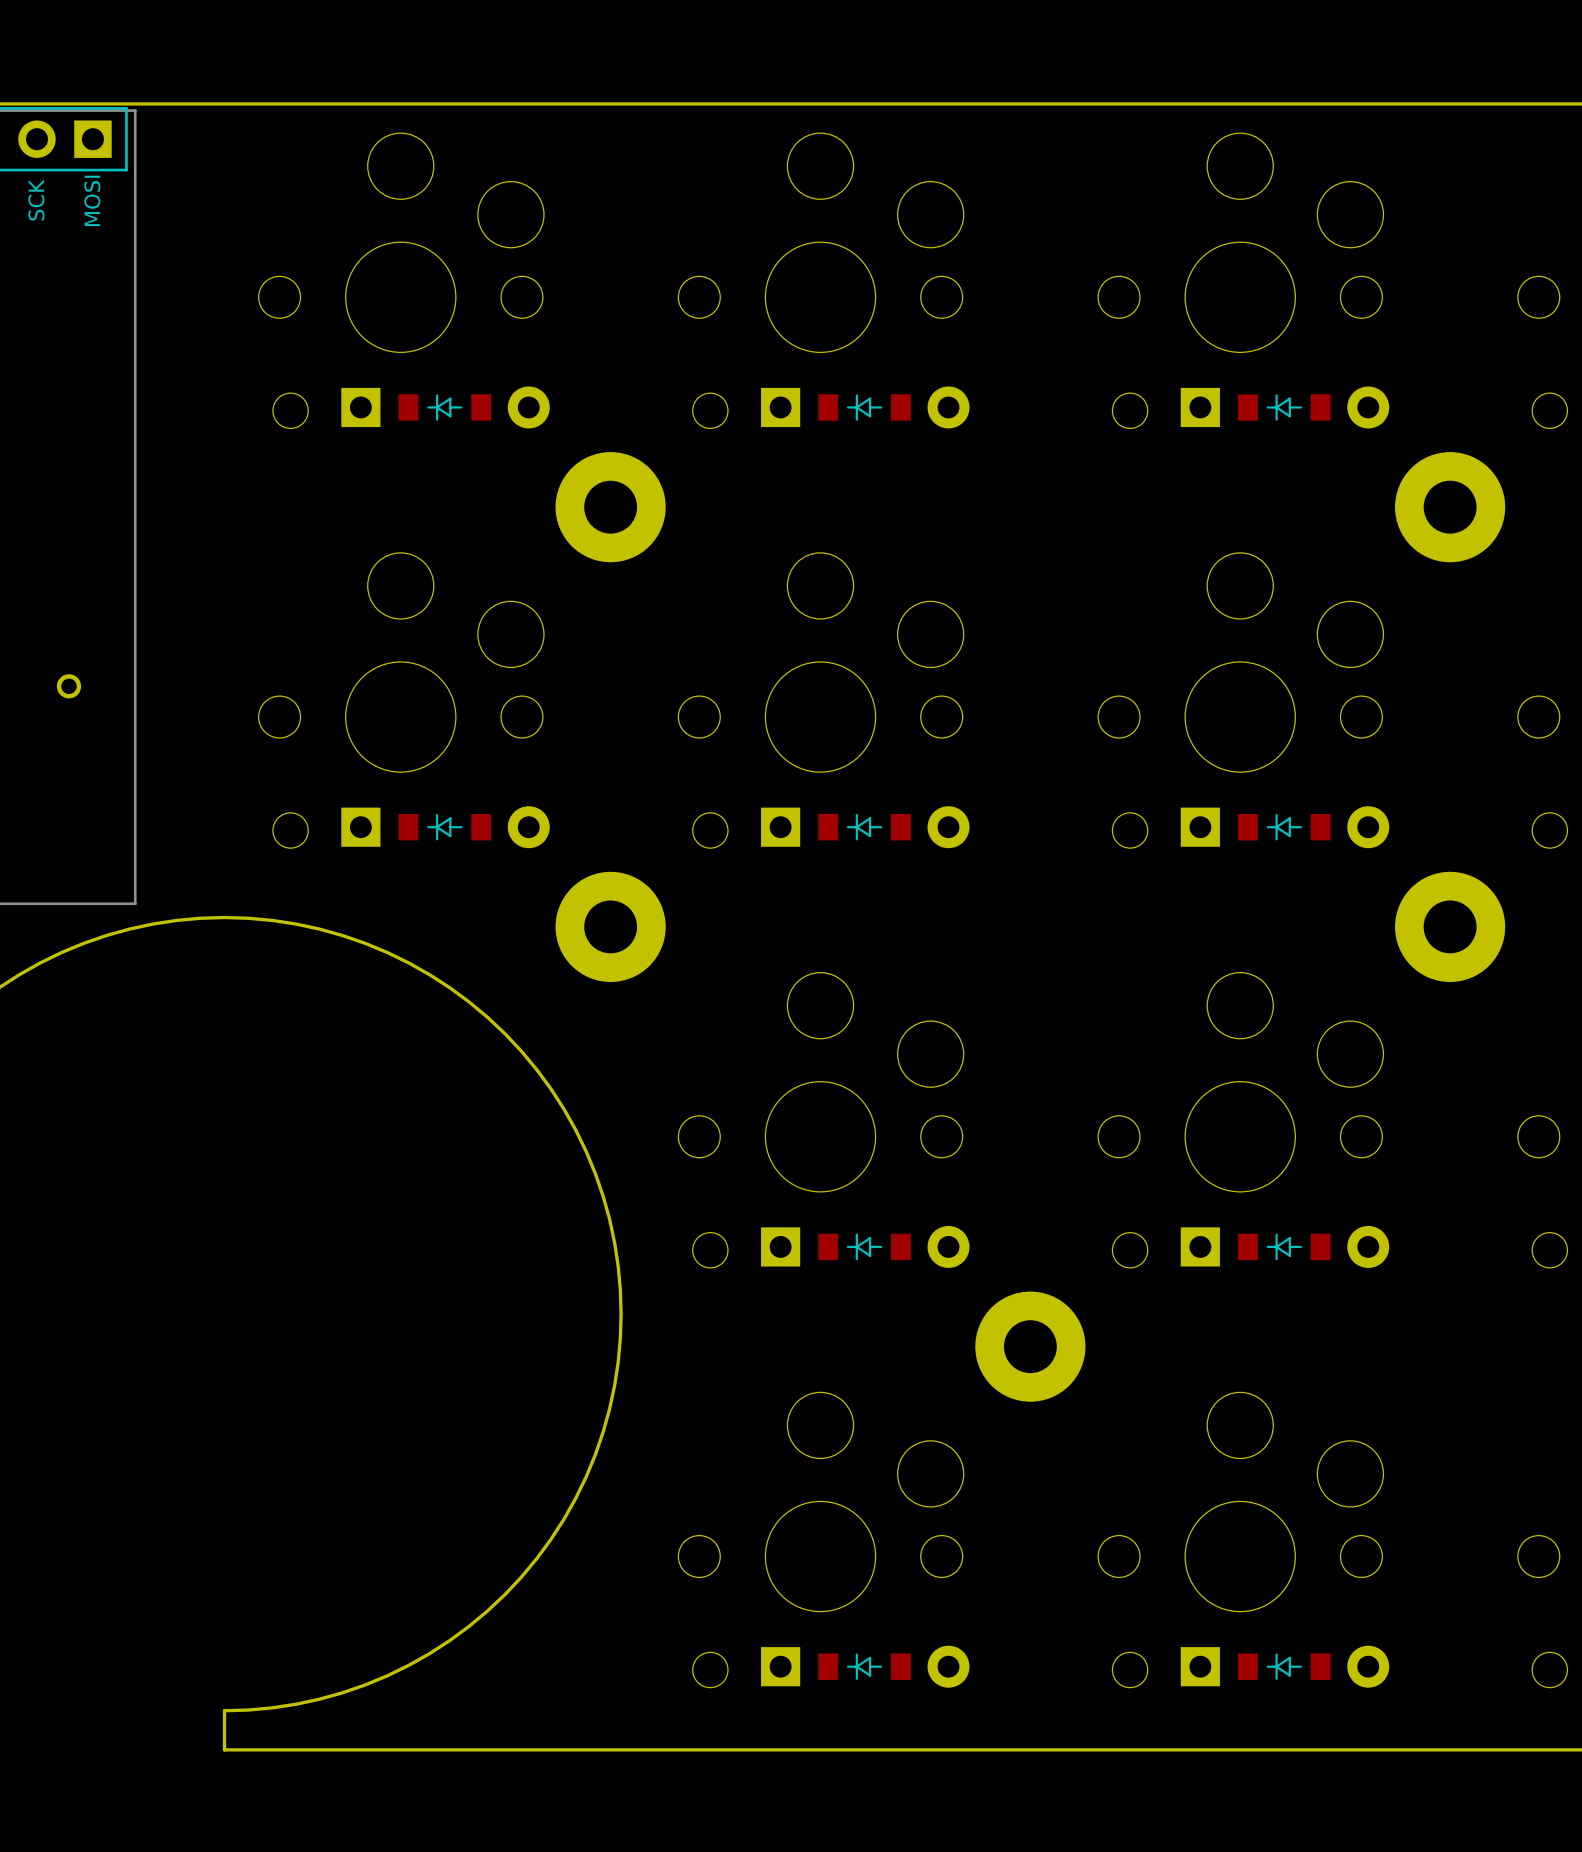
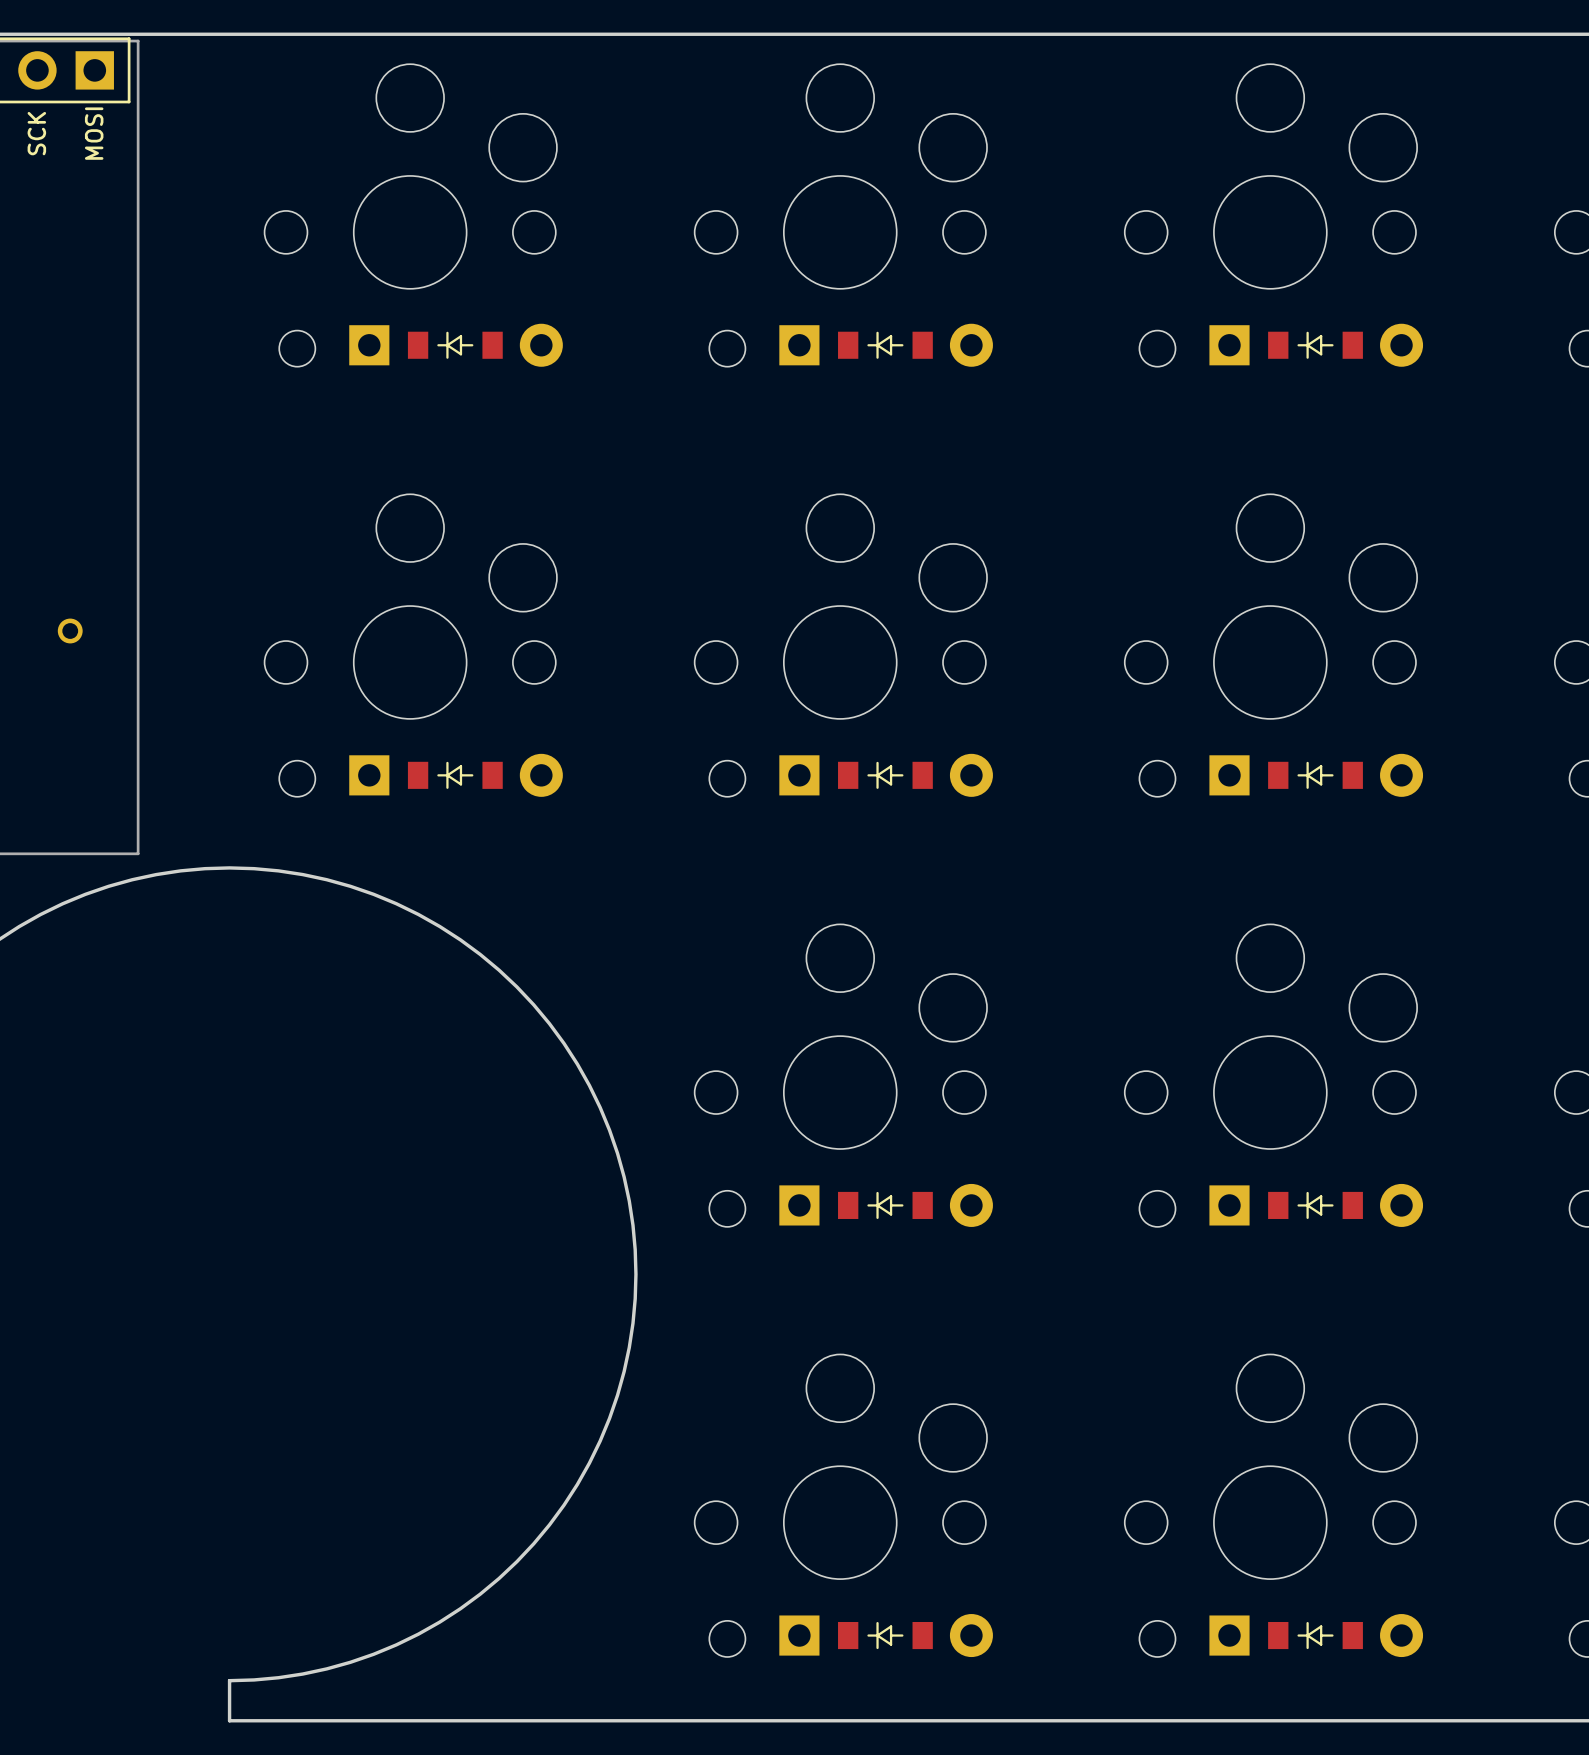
part: (610, 507) -> none
part: (1450, 507) -> none
part: (610, 926) -> none
part: (1450, 926) -> none
part: (1030, 1346) -> none

